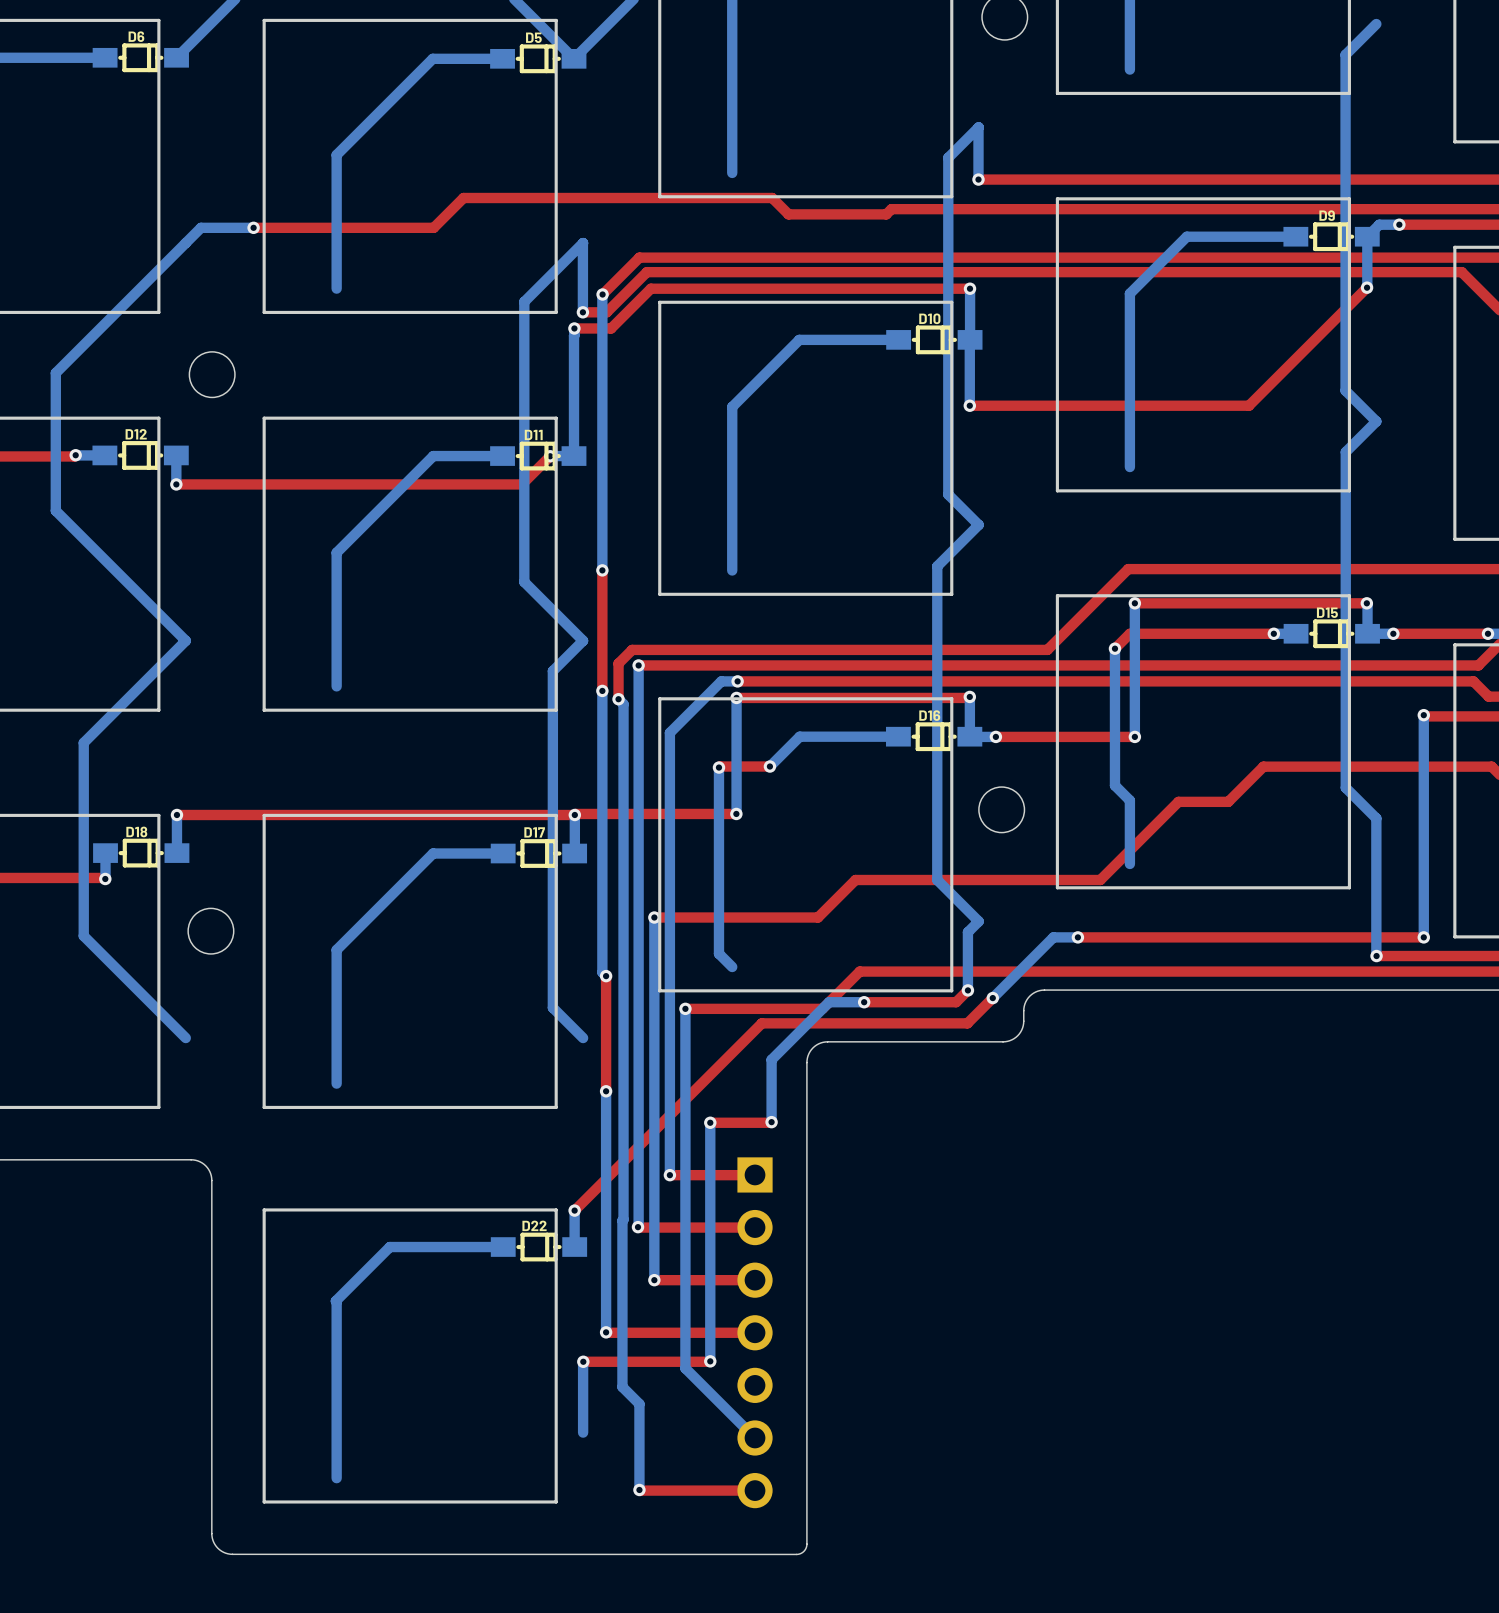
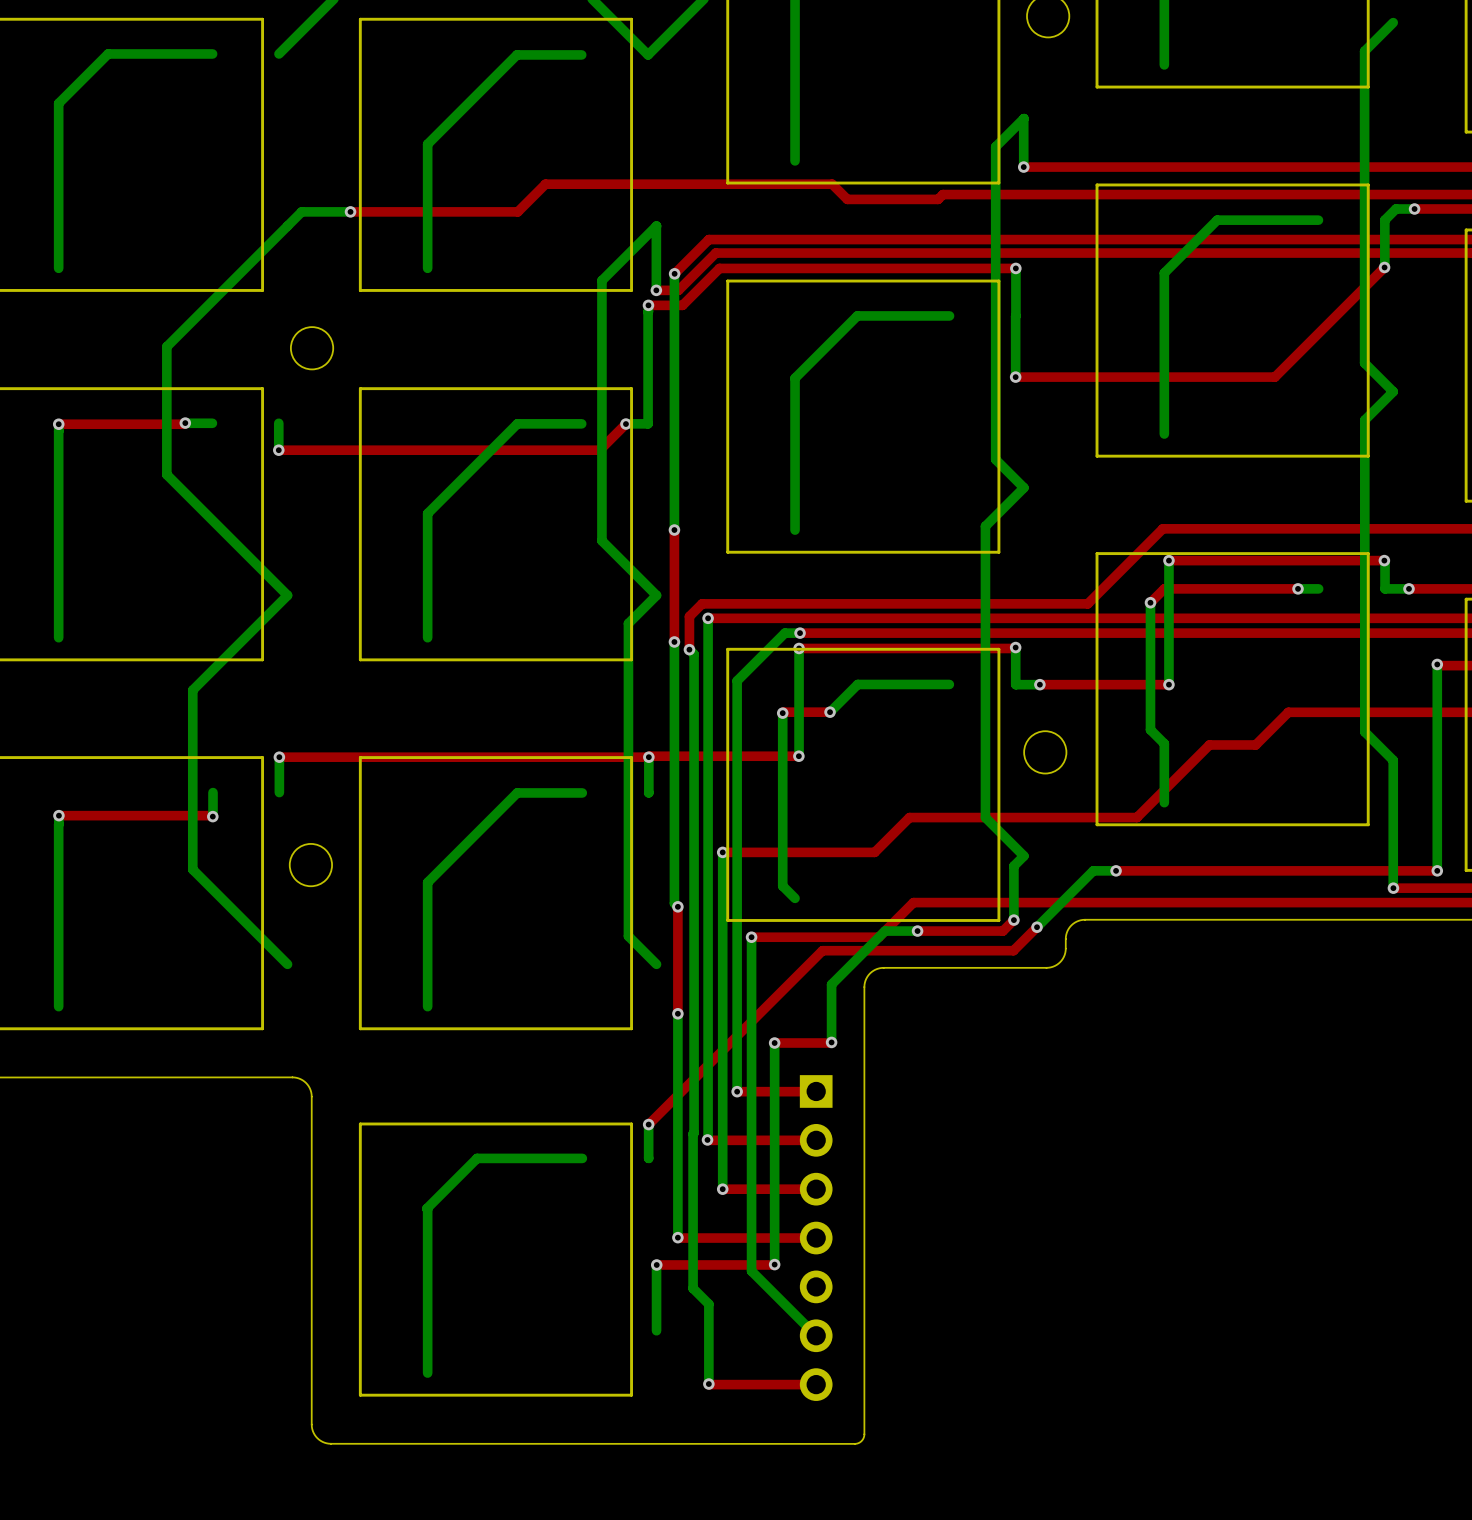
D6: (140, 57) -> none
D5: (538, 58) -> none
D9: (1331, 236) -> none
D10: (934, 339) -> none
D12: (140, 455) -> none
D11: (538, 456) -> none
D15: (1331, 633) -> none
D16: (934, 736) -> none
D18: (141, 853) -> none
D17: (538, 853) -> none
D22: (538, 1247) -> none

